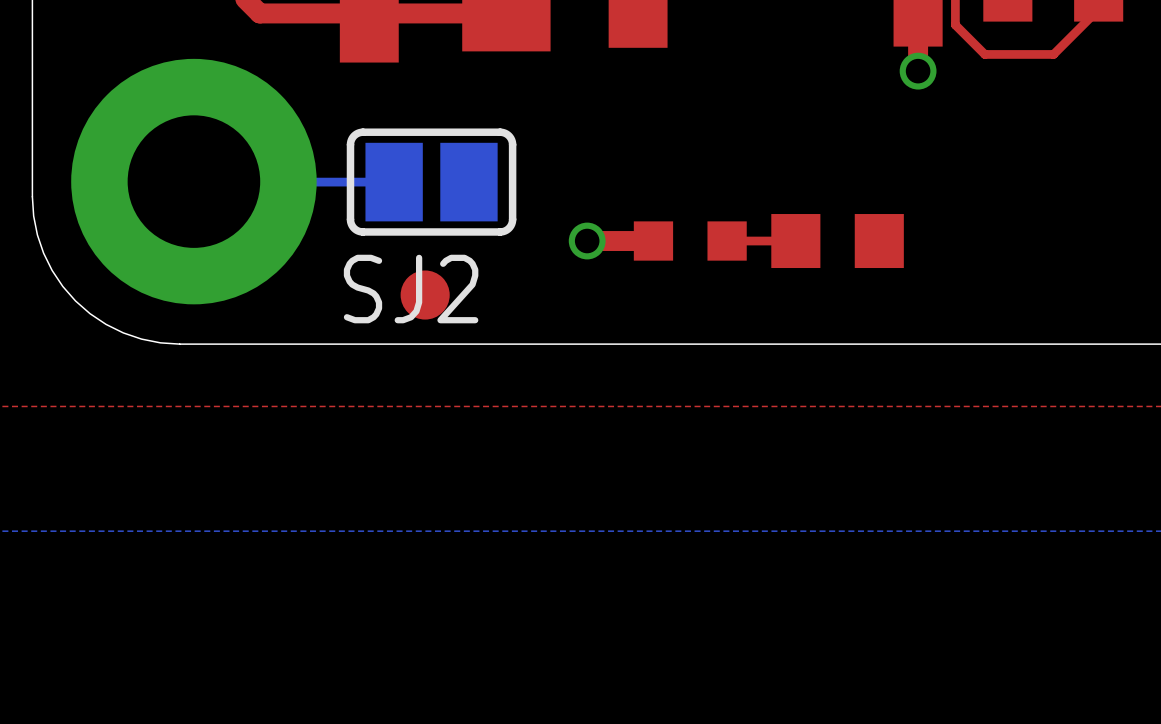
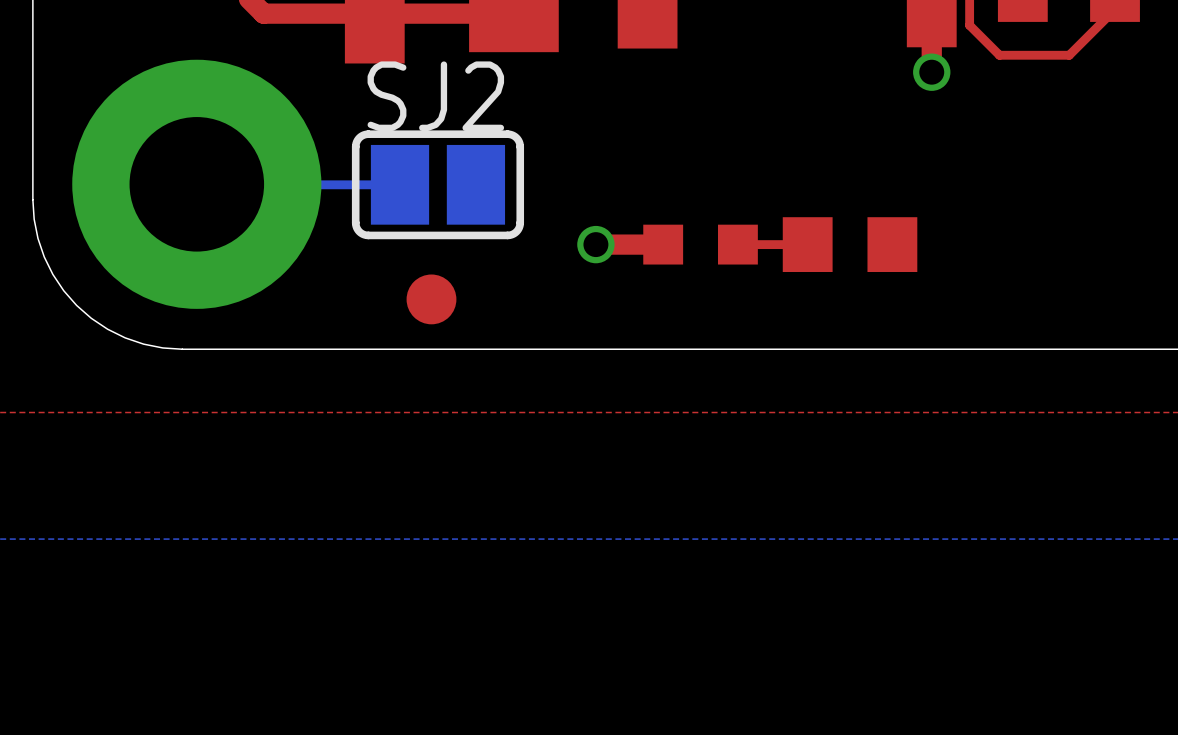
SJ2 name position: SJ2 (411, 289) -> SJ2 (435, 96)

